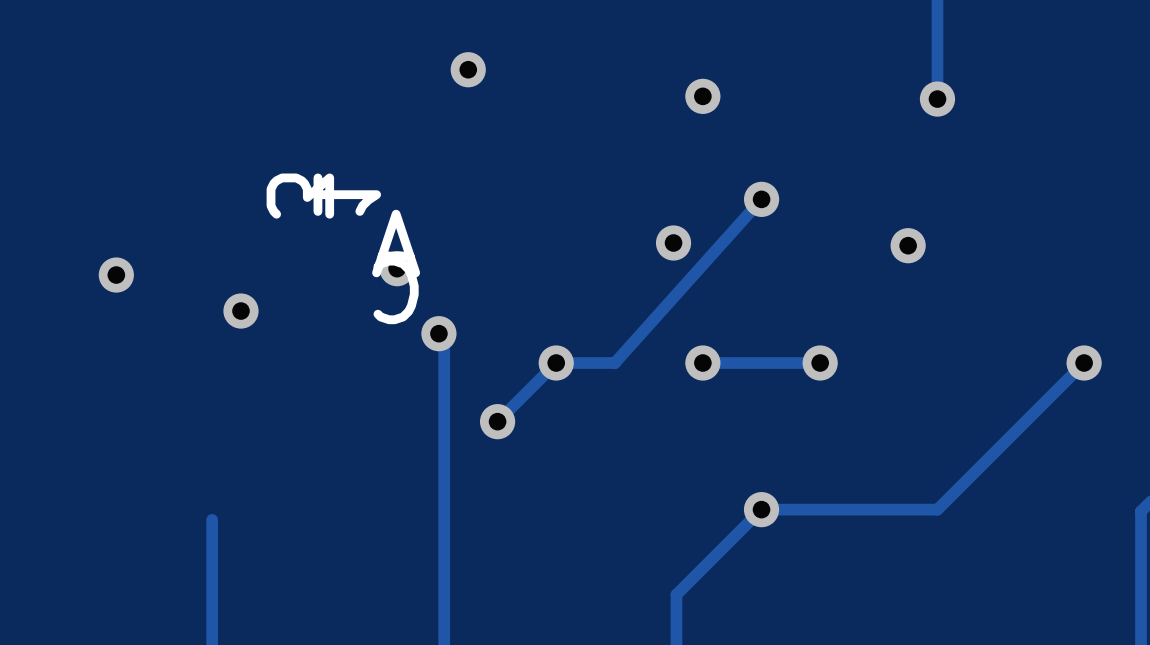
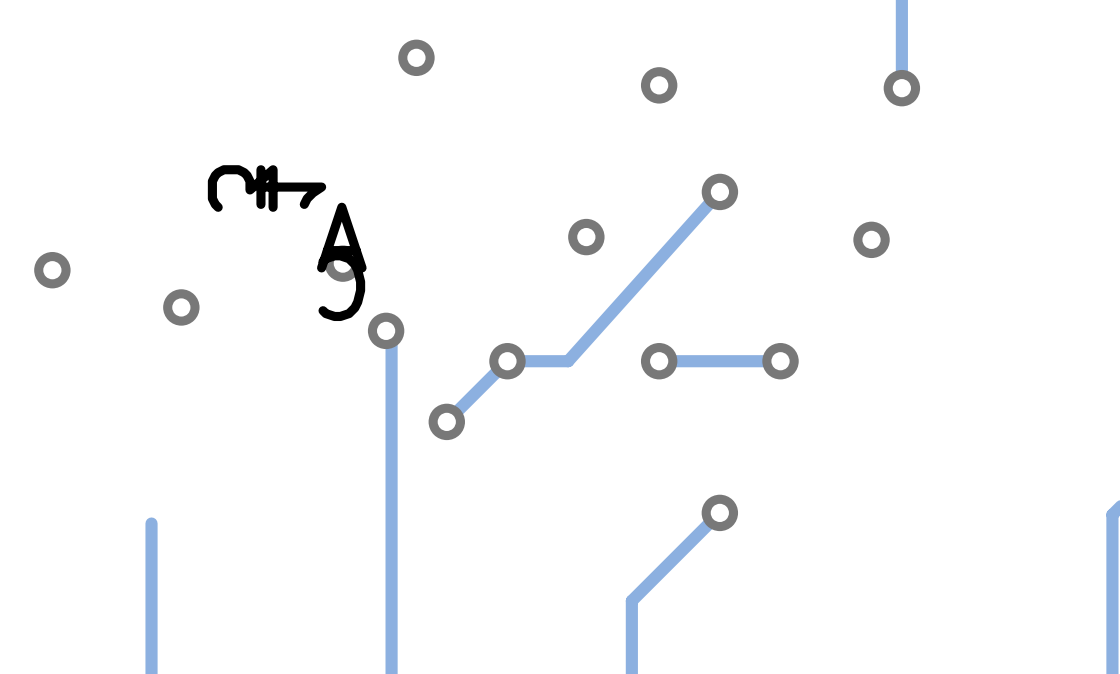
via position: (673, 243) -> (586, 237)
track: (1084, 363) (937, 509) (761, 509) -> none
via: (1084, 363) -> none

